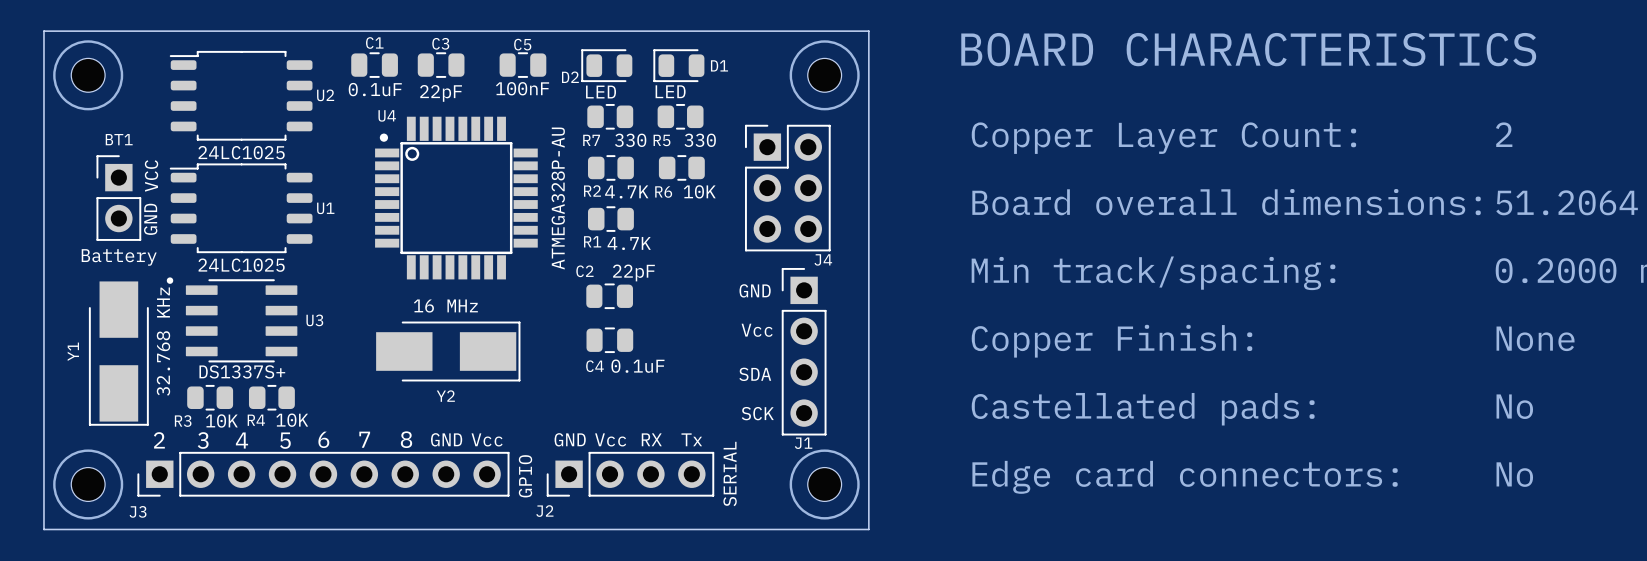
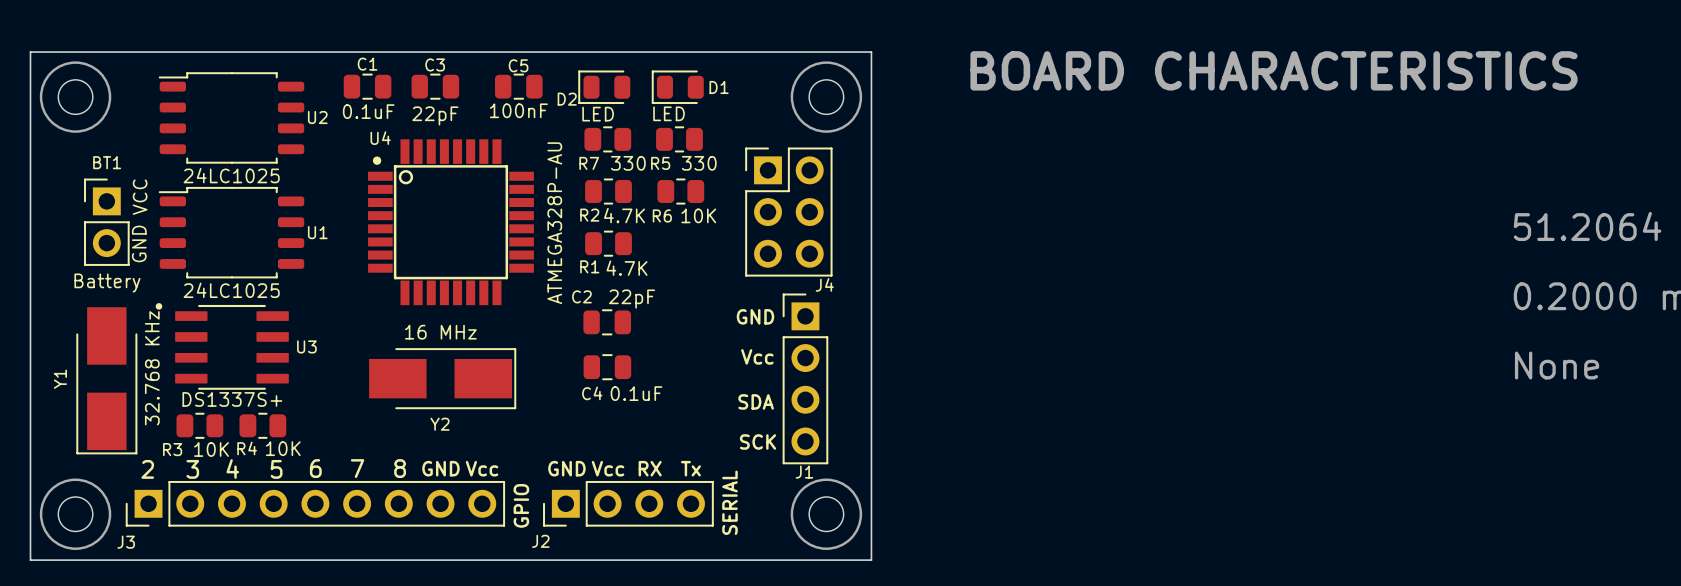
text: 2 (1504, 134) -> none
text: Copper Layer Count: (1163, 138) -> none
text: Board overall dimensions: (1226, 202) -> none
text: Min track/spacing: (1153, 273) -> none
text: Copper Finish: (1112, 341) -> none
text: No (1514, 406) -> none
text: Castellated pads: (1143, 409) -> none
text: No (1514, 474) -> none
text: Edge card connectors: (1185, 477) -> none

